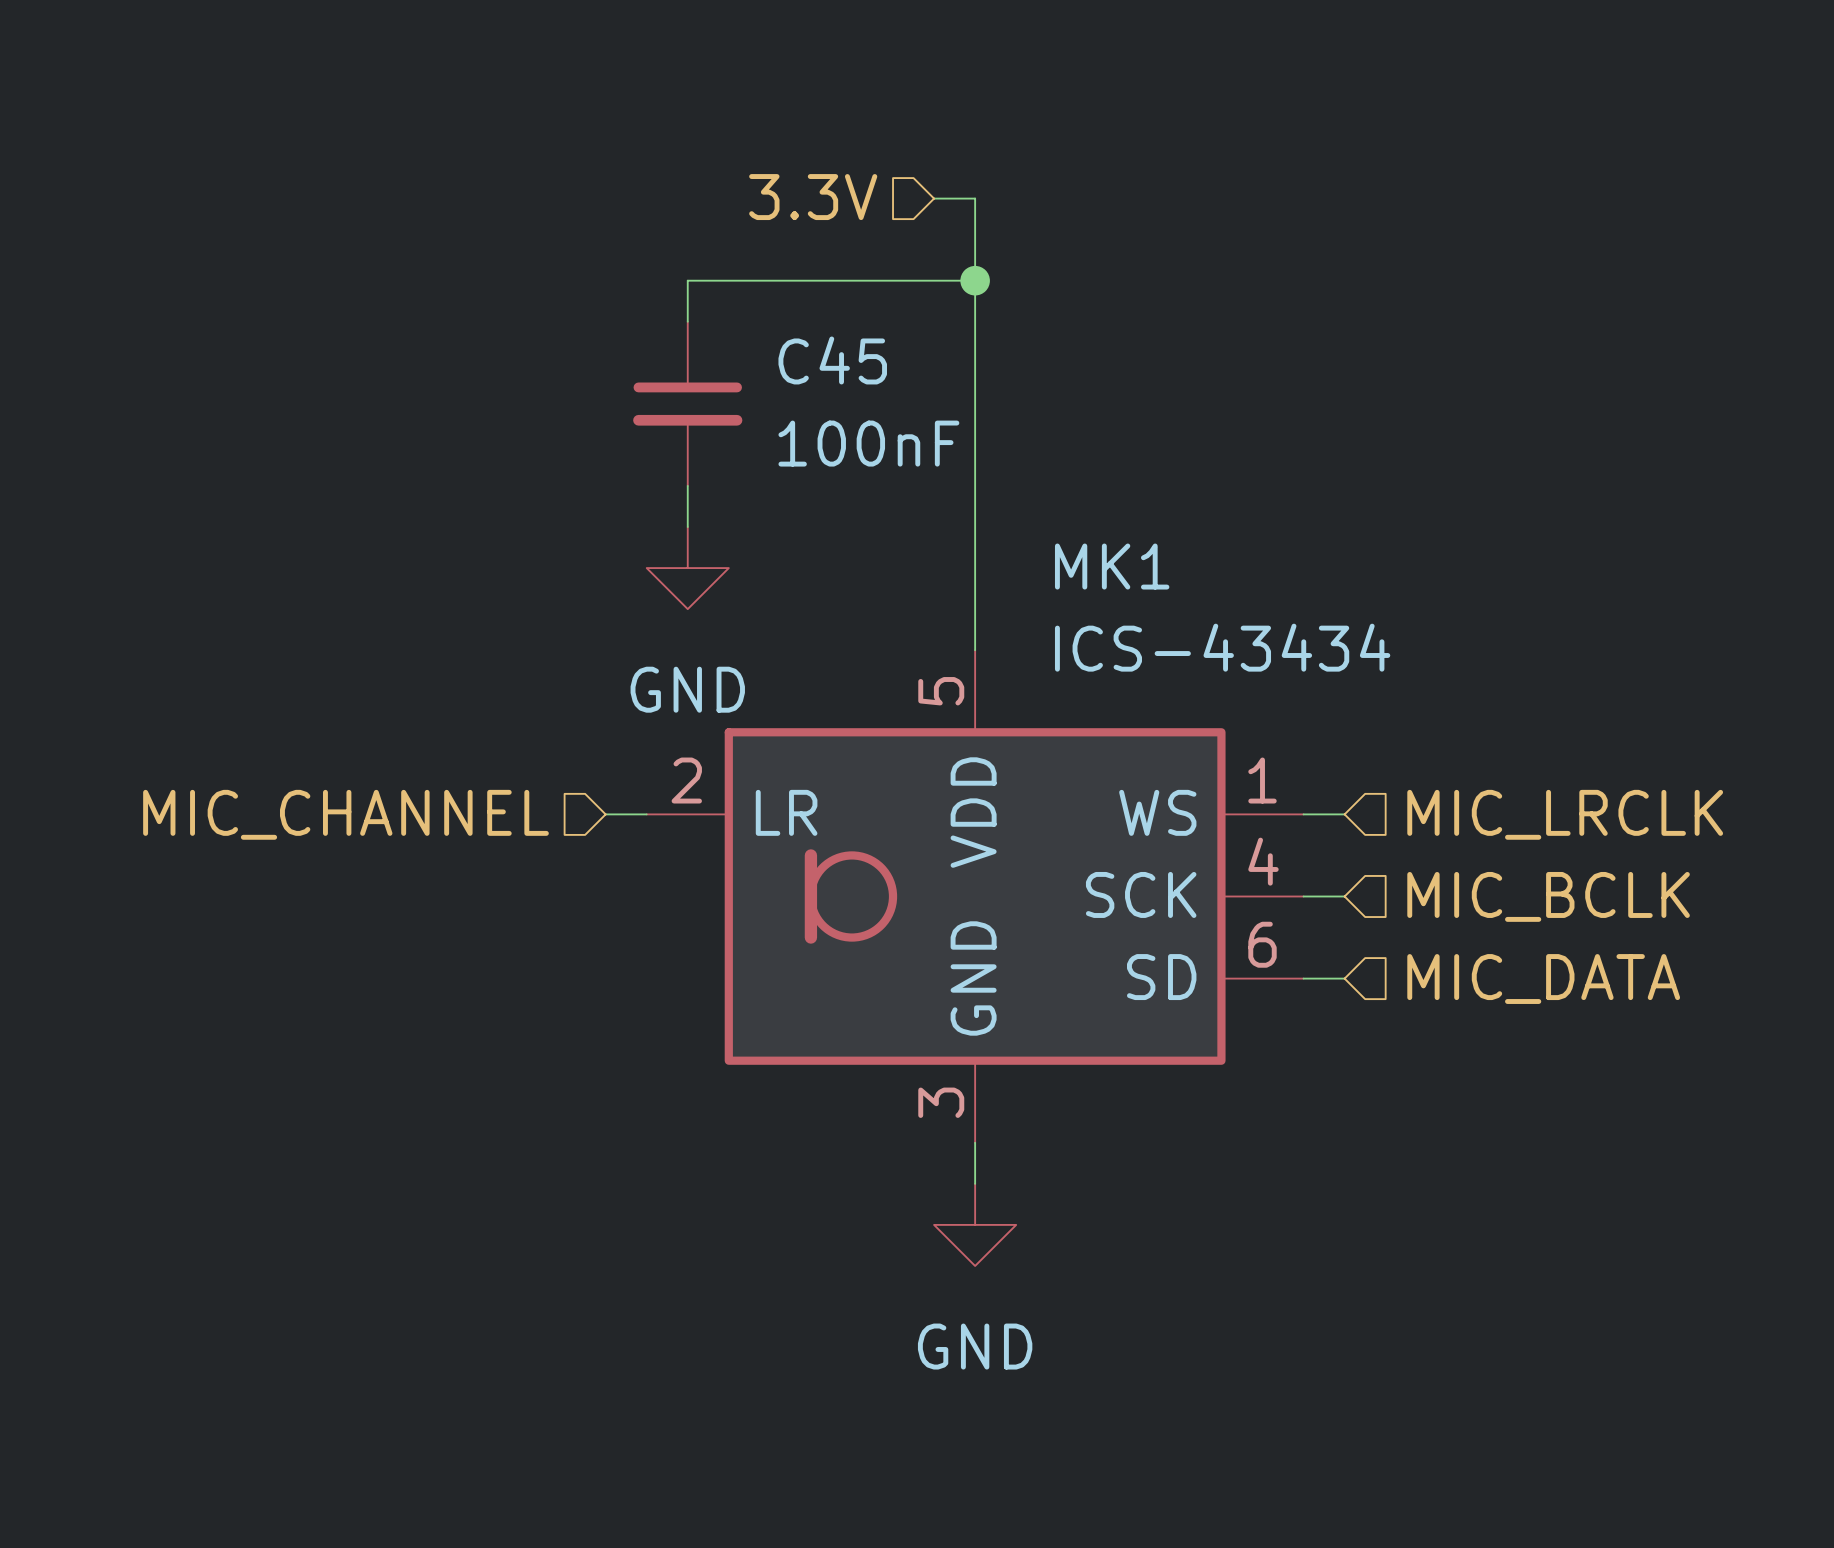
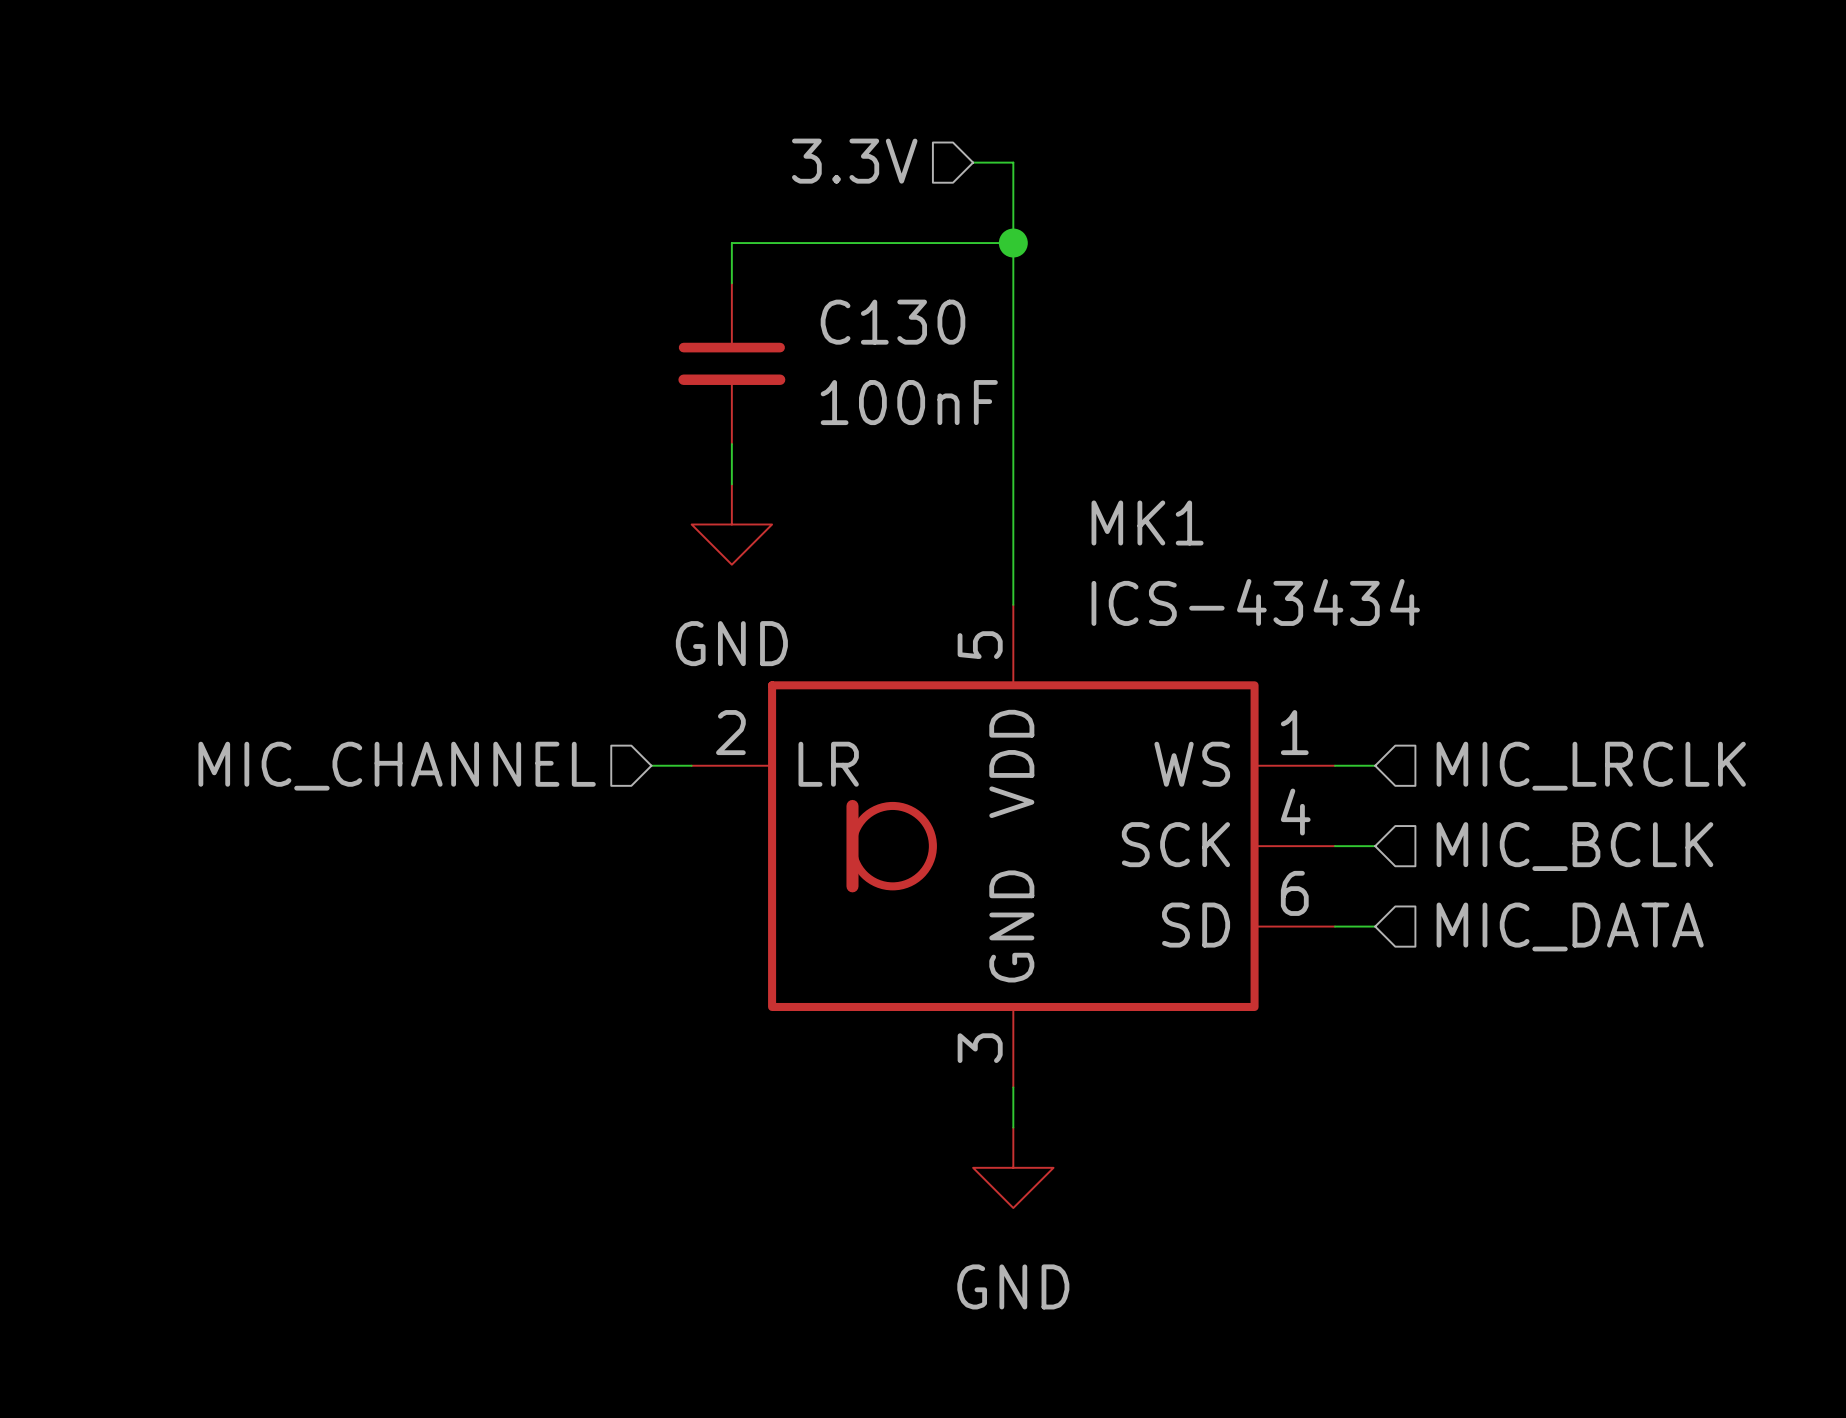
C45 name: C45 (832, 360) -> C130 (893, 322)

